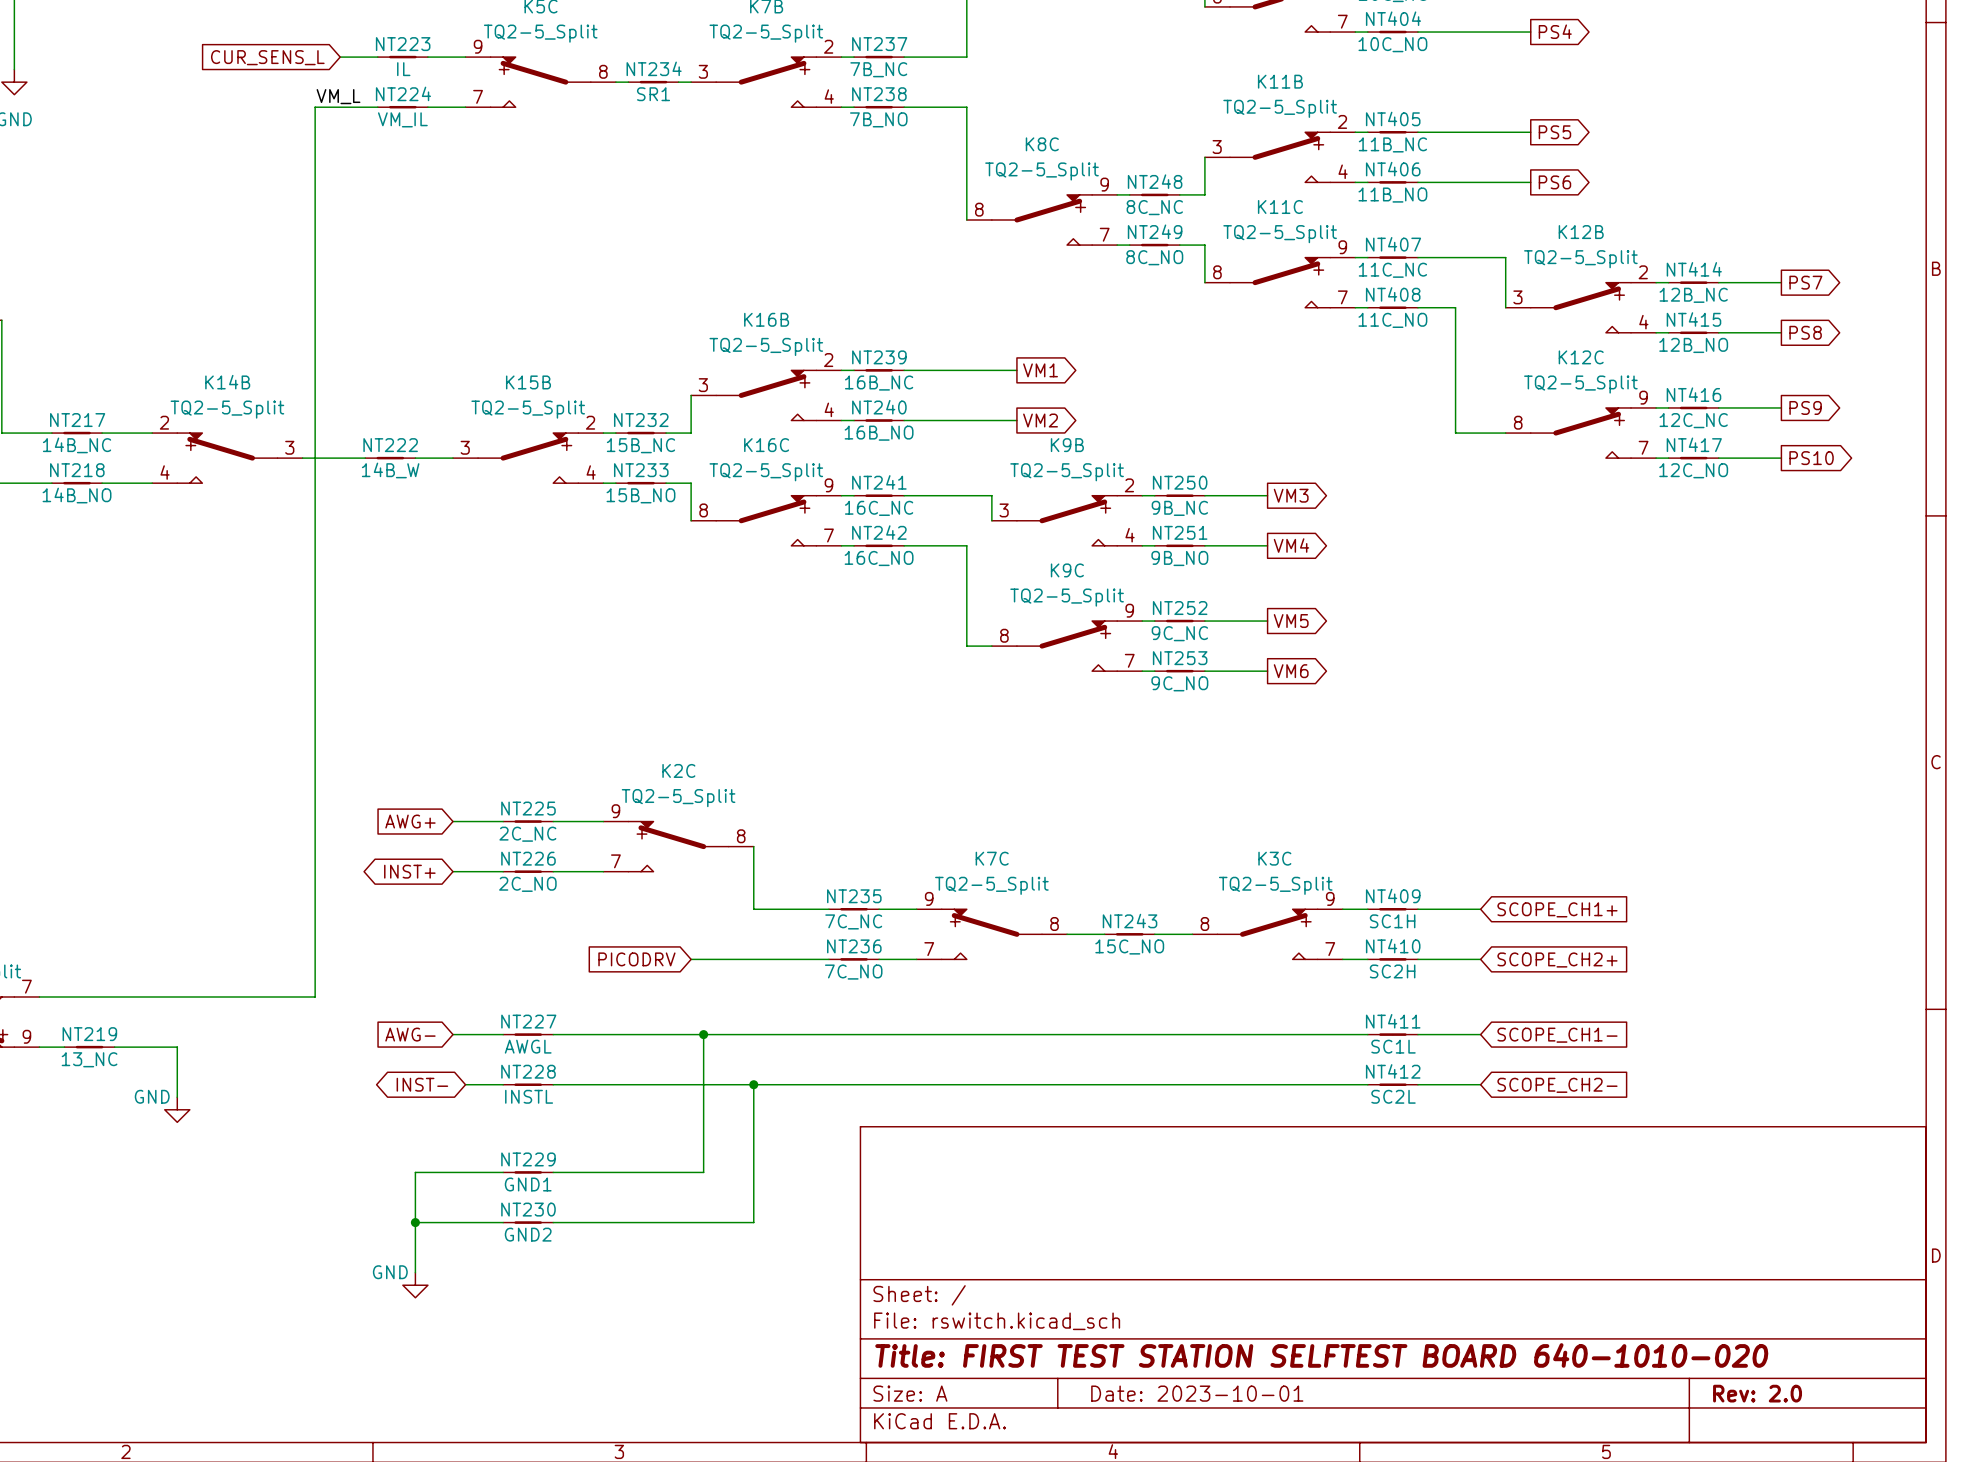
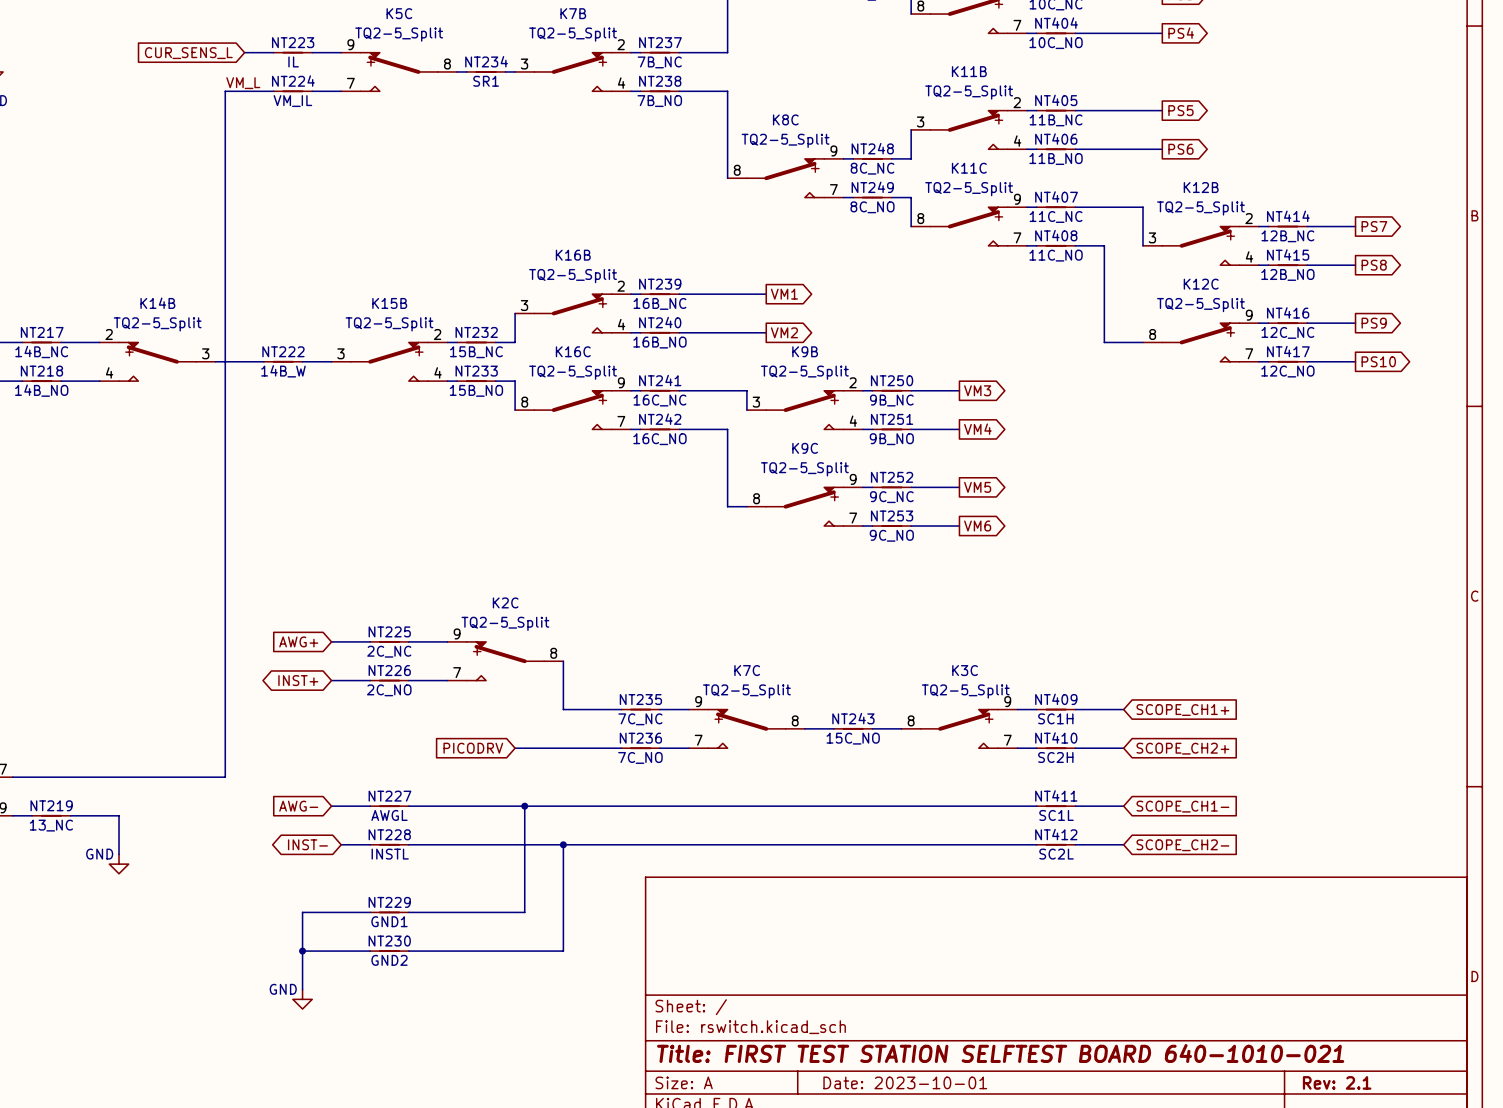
title block: Title: FIRST TEST STATION SELFTEST BOARD 640-1010-020 (1321, 1355) -> Title: FIRST TEST STATION SELFTEST BOARD 640-1010-021 (1000, 1053)
title block: Rev: 2.0 (1757, 1393) -> Rev: 2.1 (1337, 1082)

